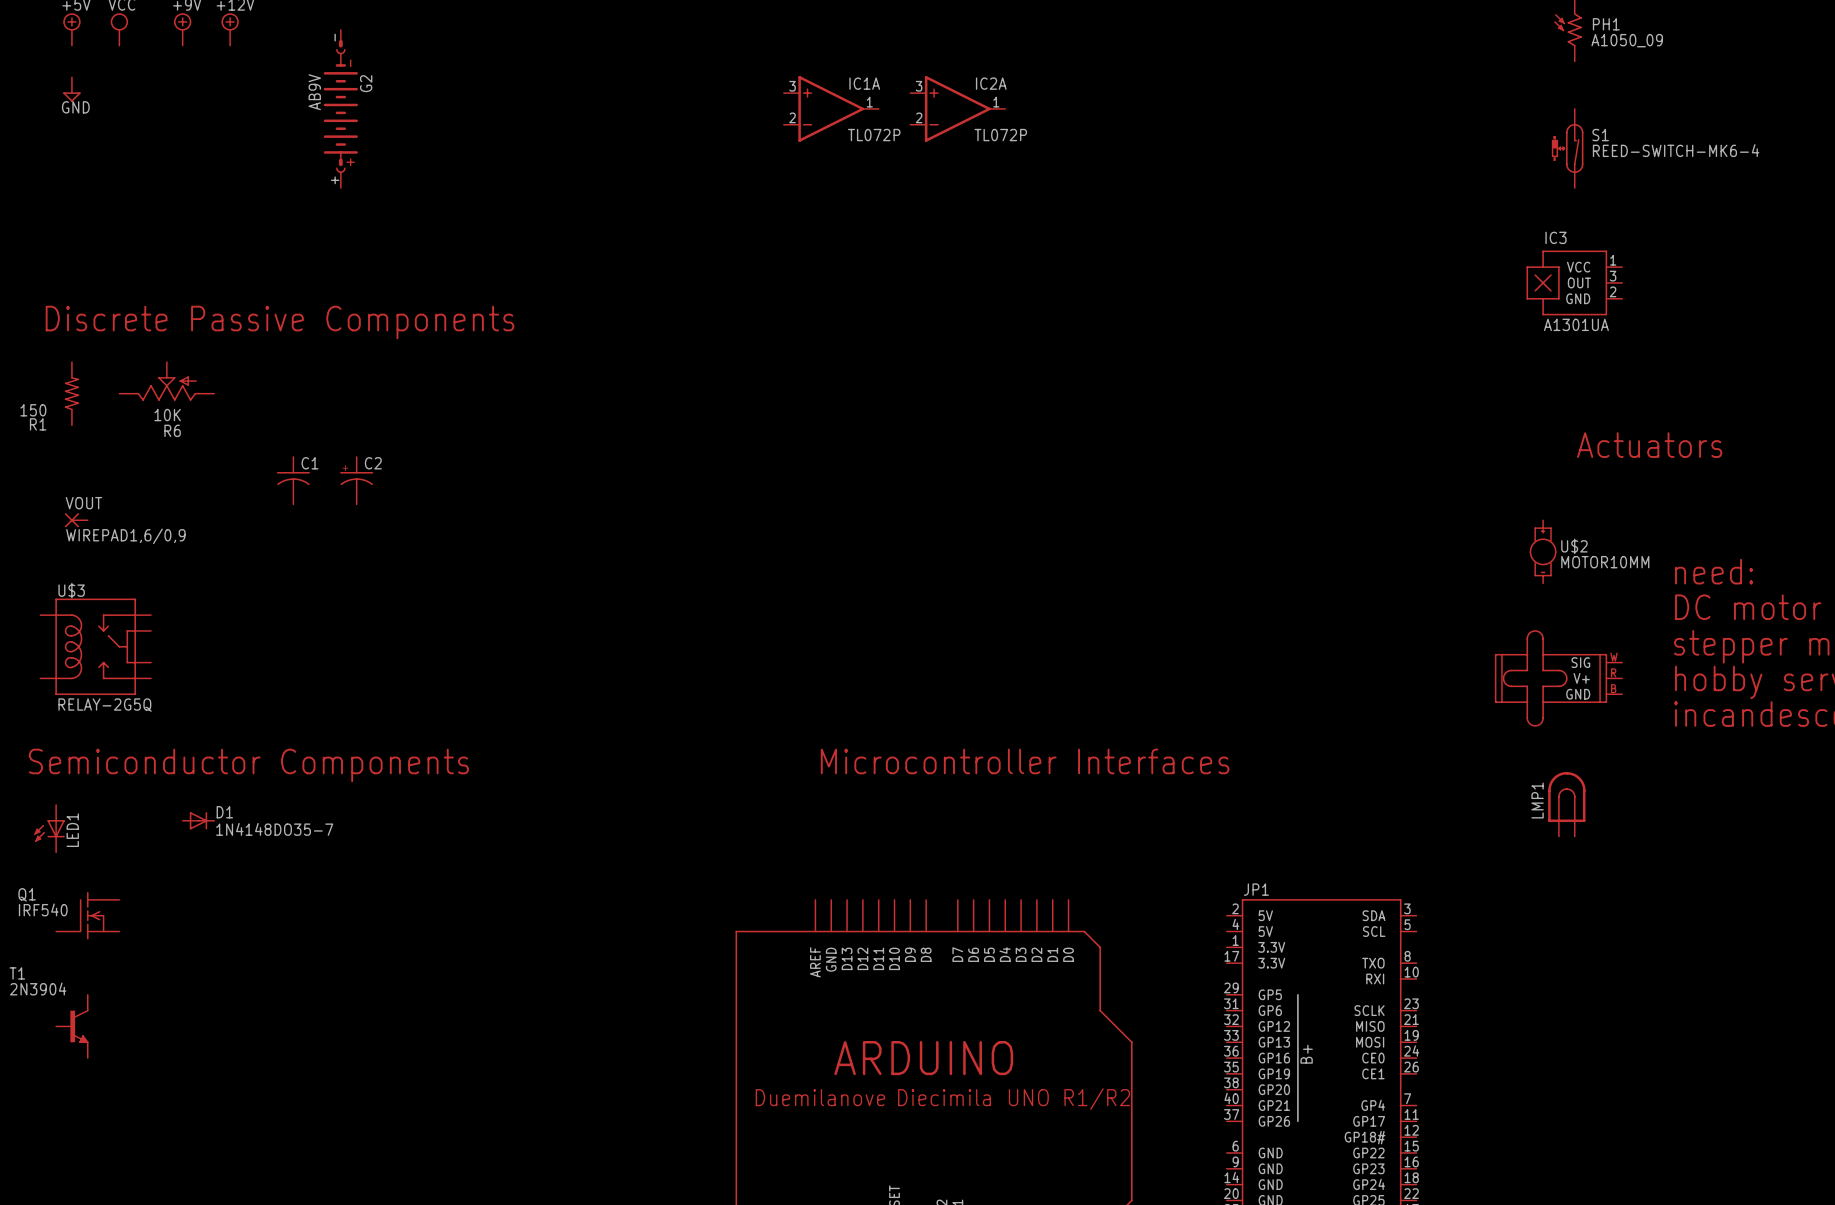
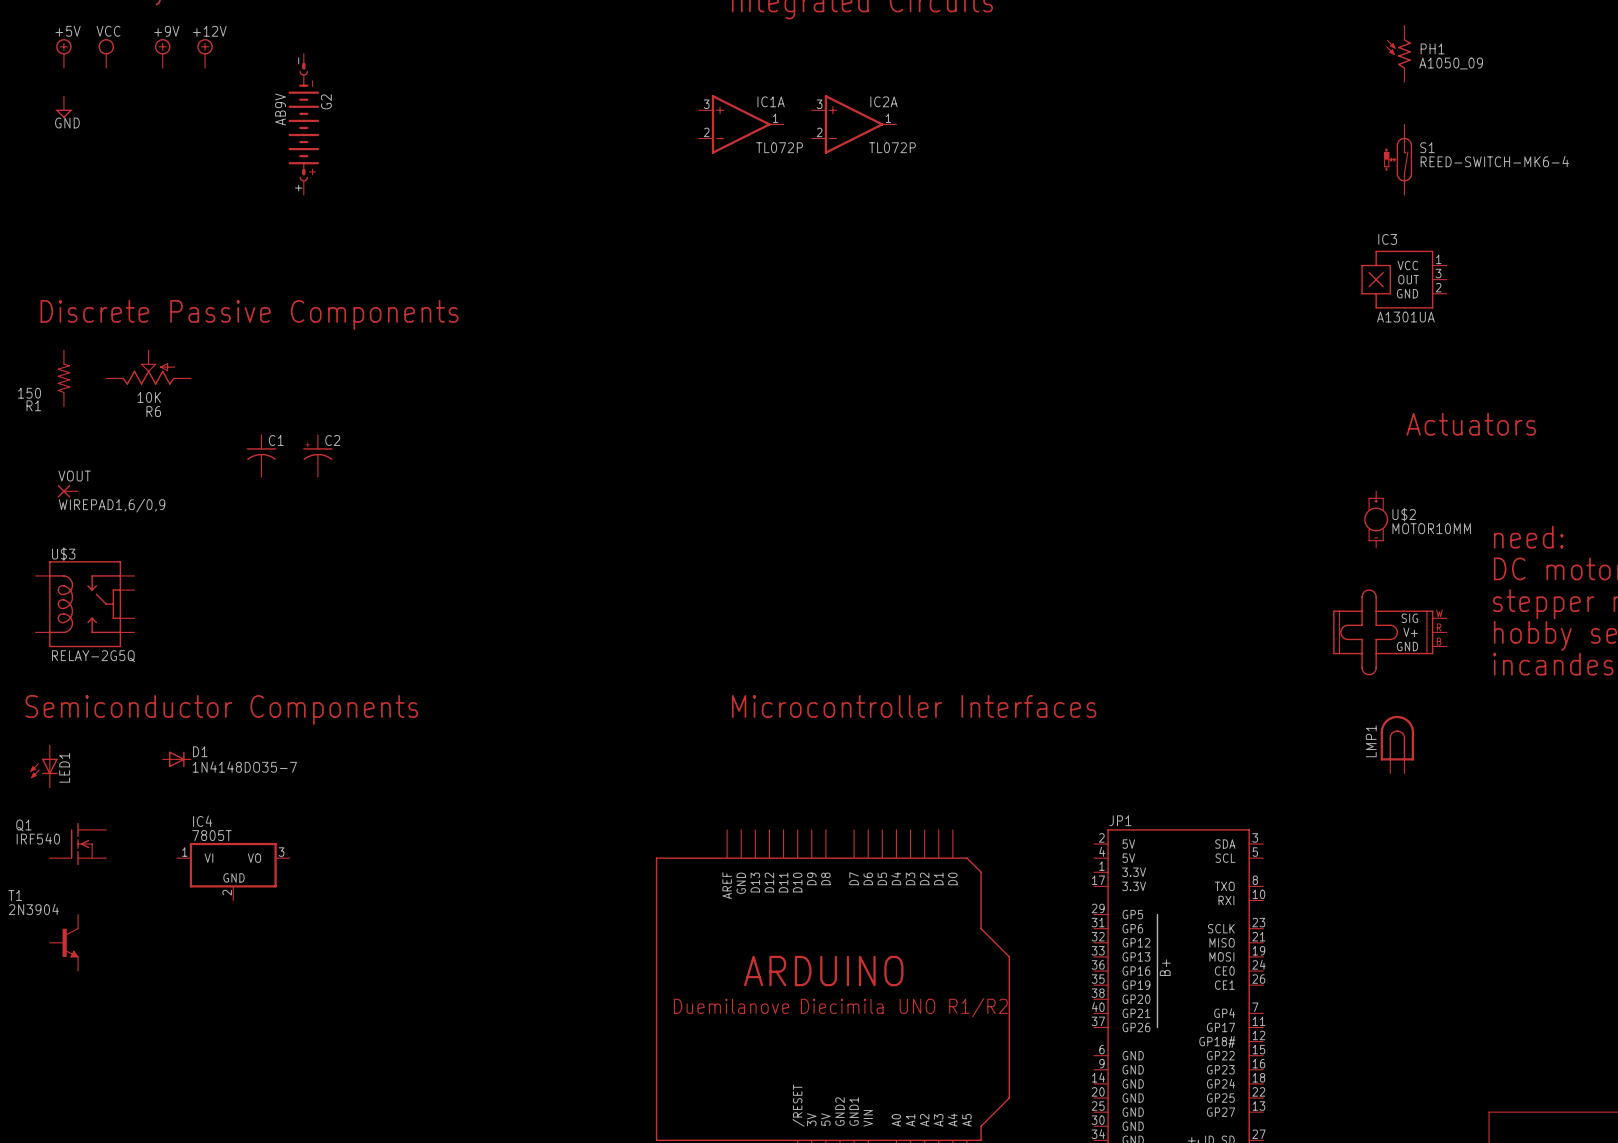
IC4: none -> 7805T (233, 871)

